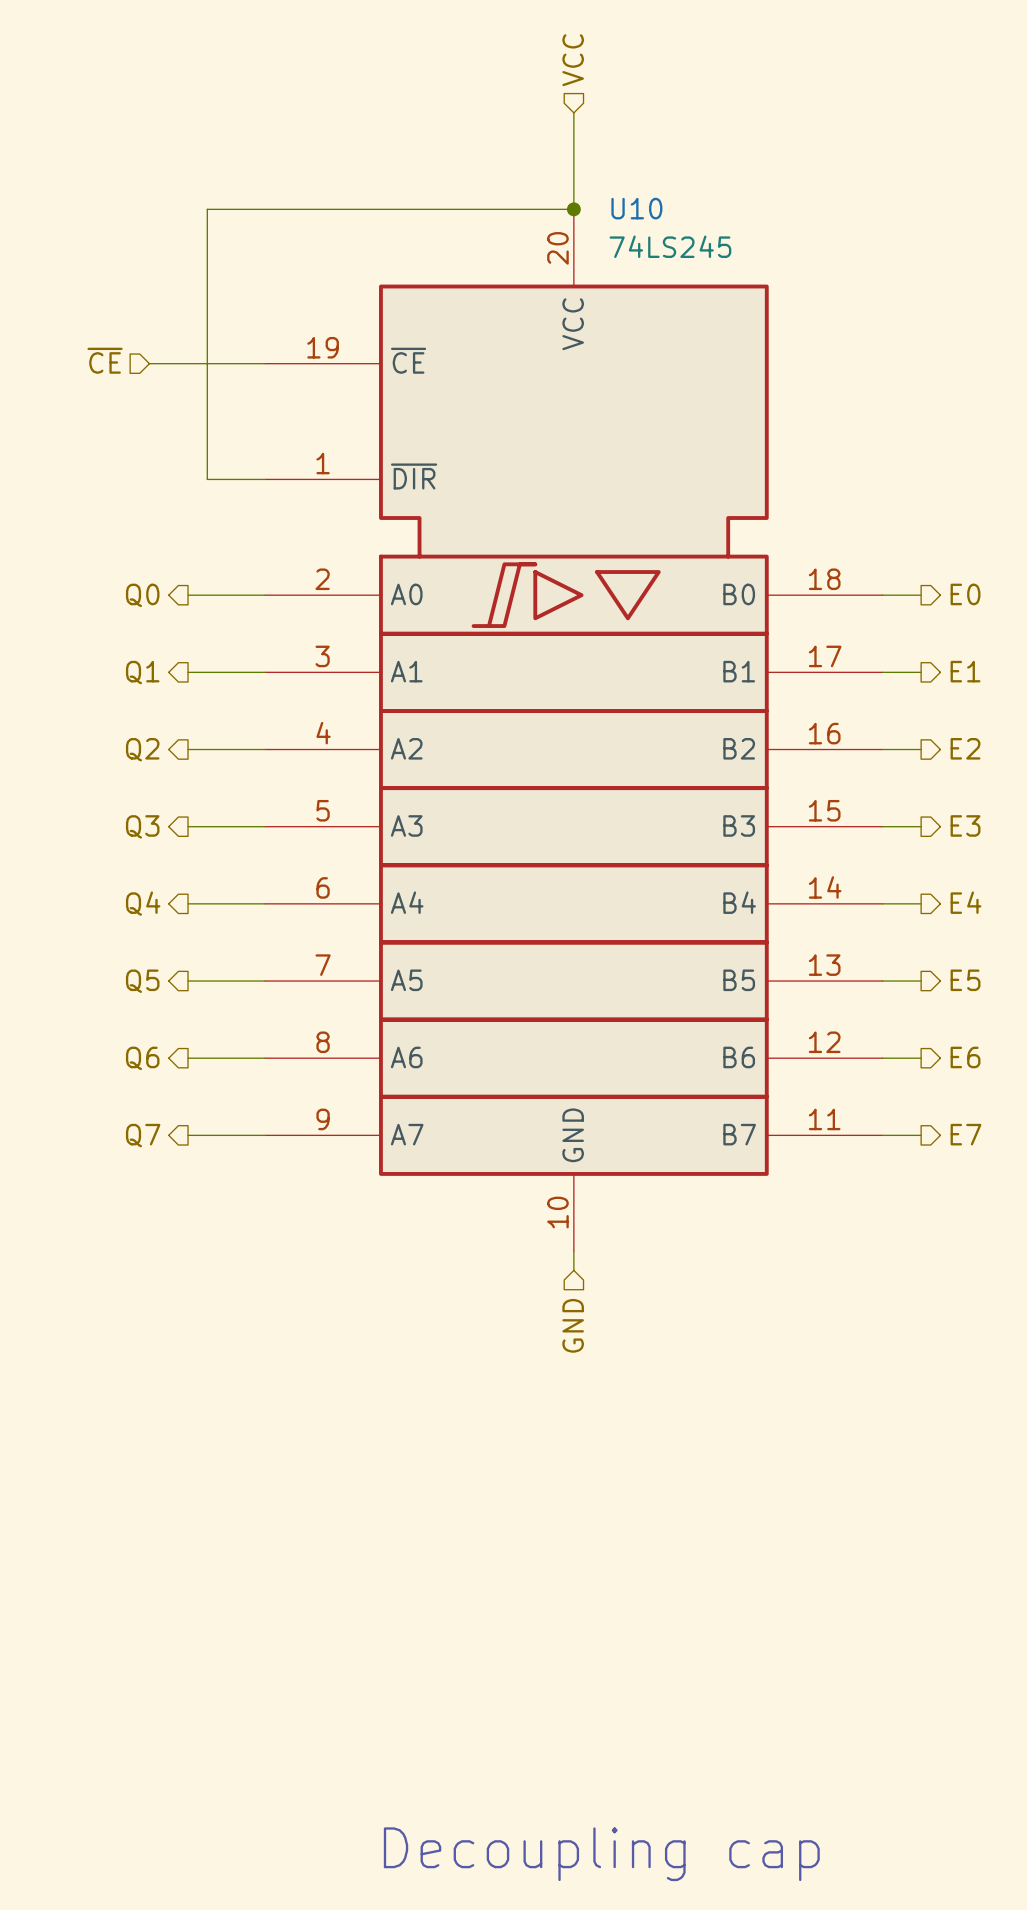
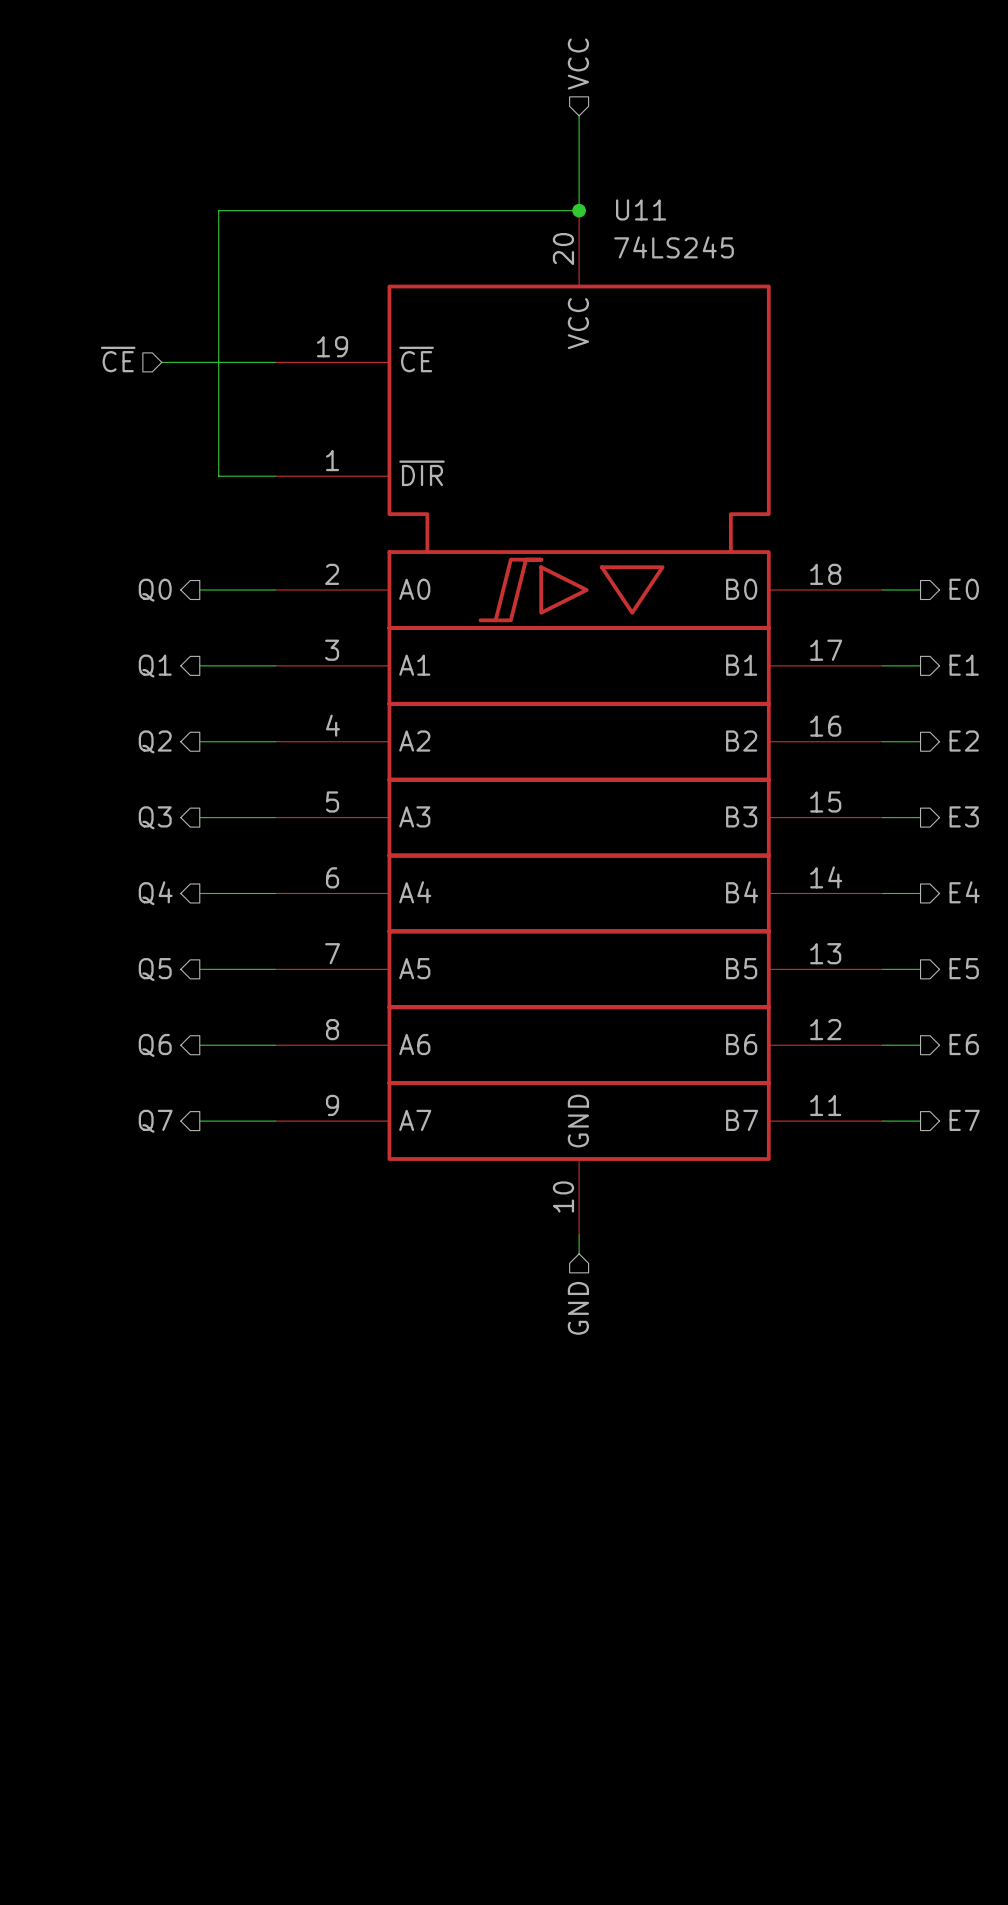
U10 name: U10 (636, 208) -> U11 (641, 209)
text: Decoupling cap (601, 1854) -> none

